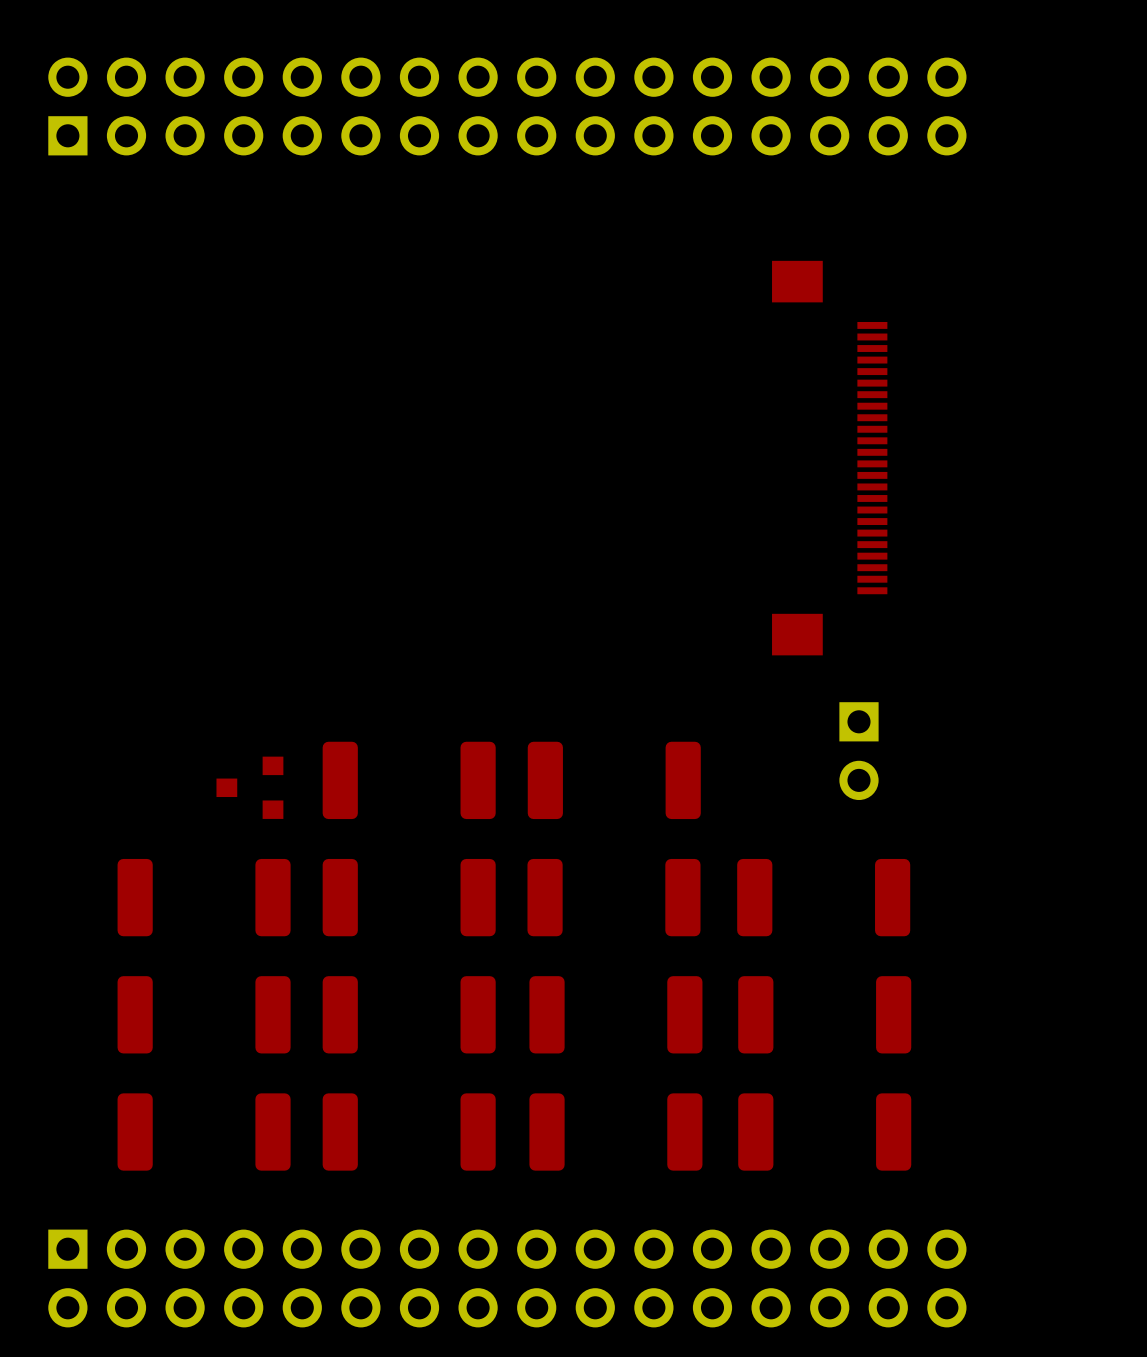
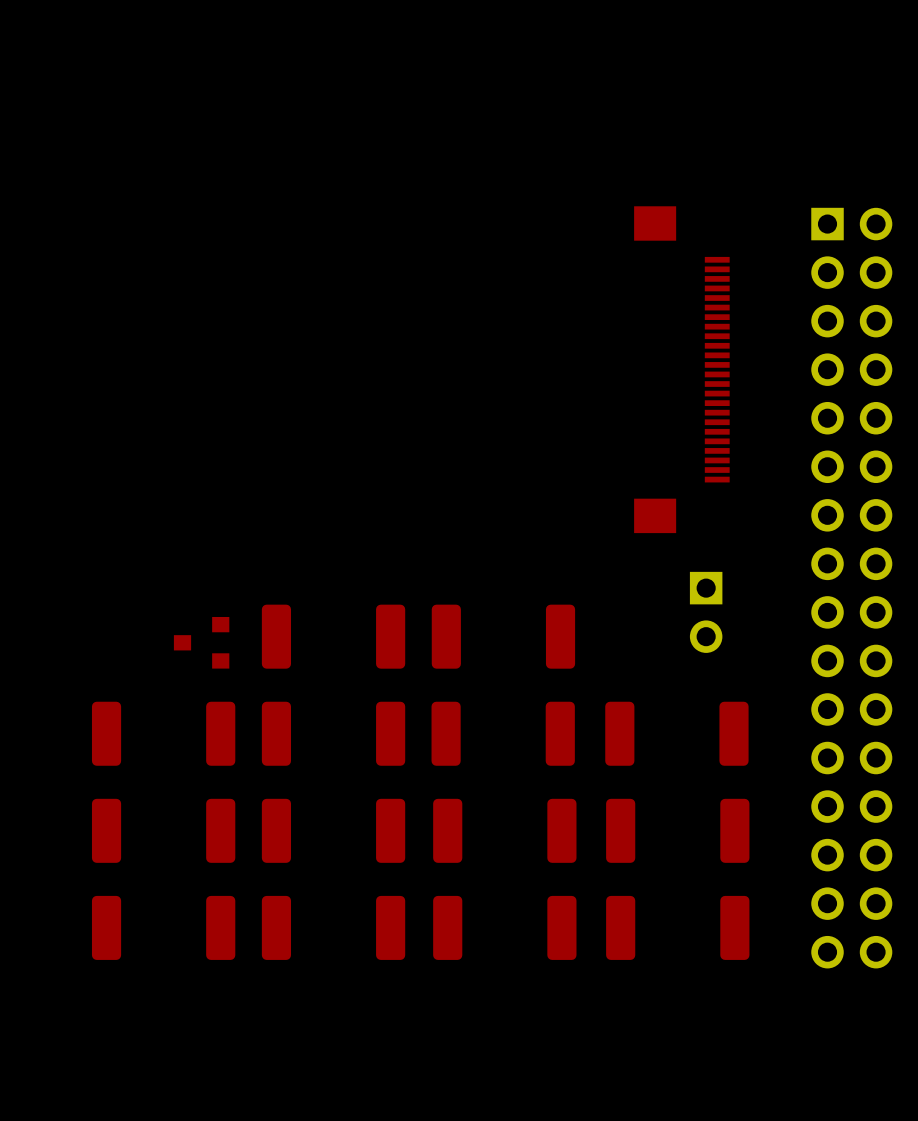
part: (507, 106) -> none
part: none -> (851, 588)
part: (507, 1278) -> none

